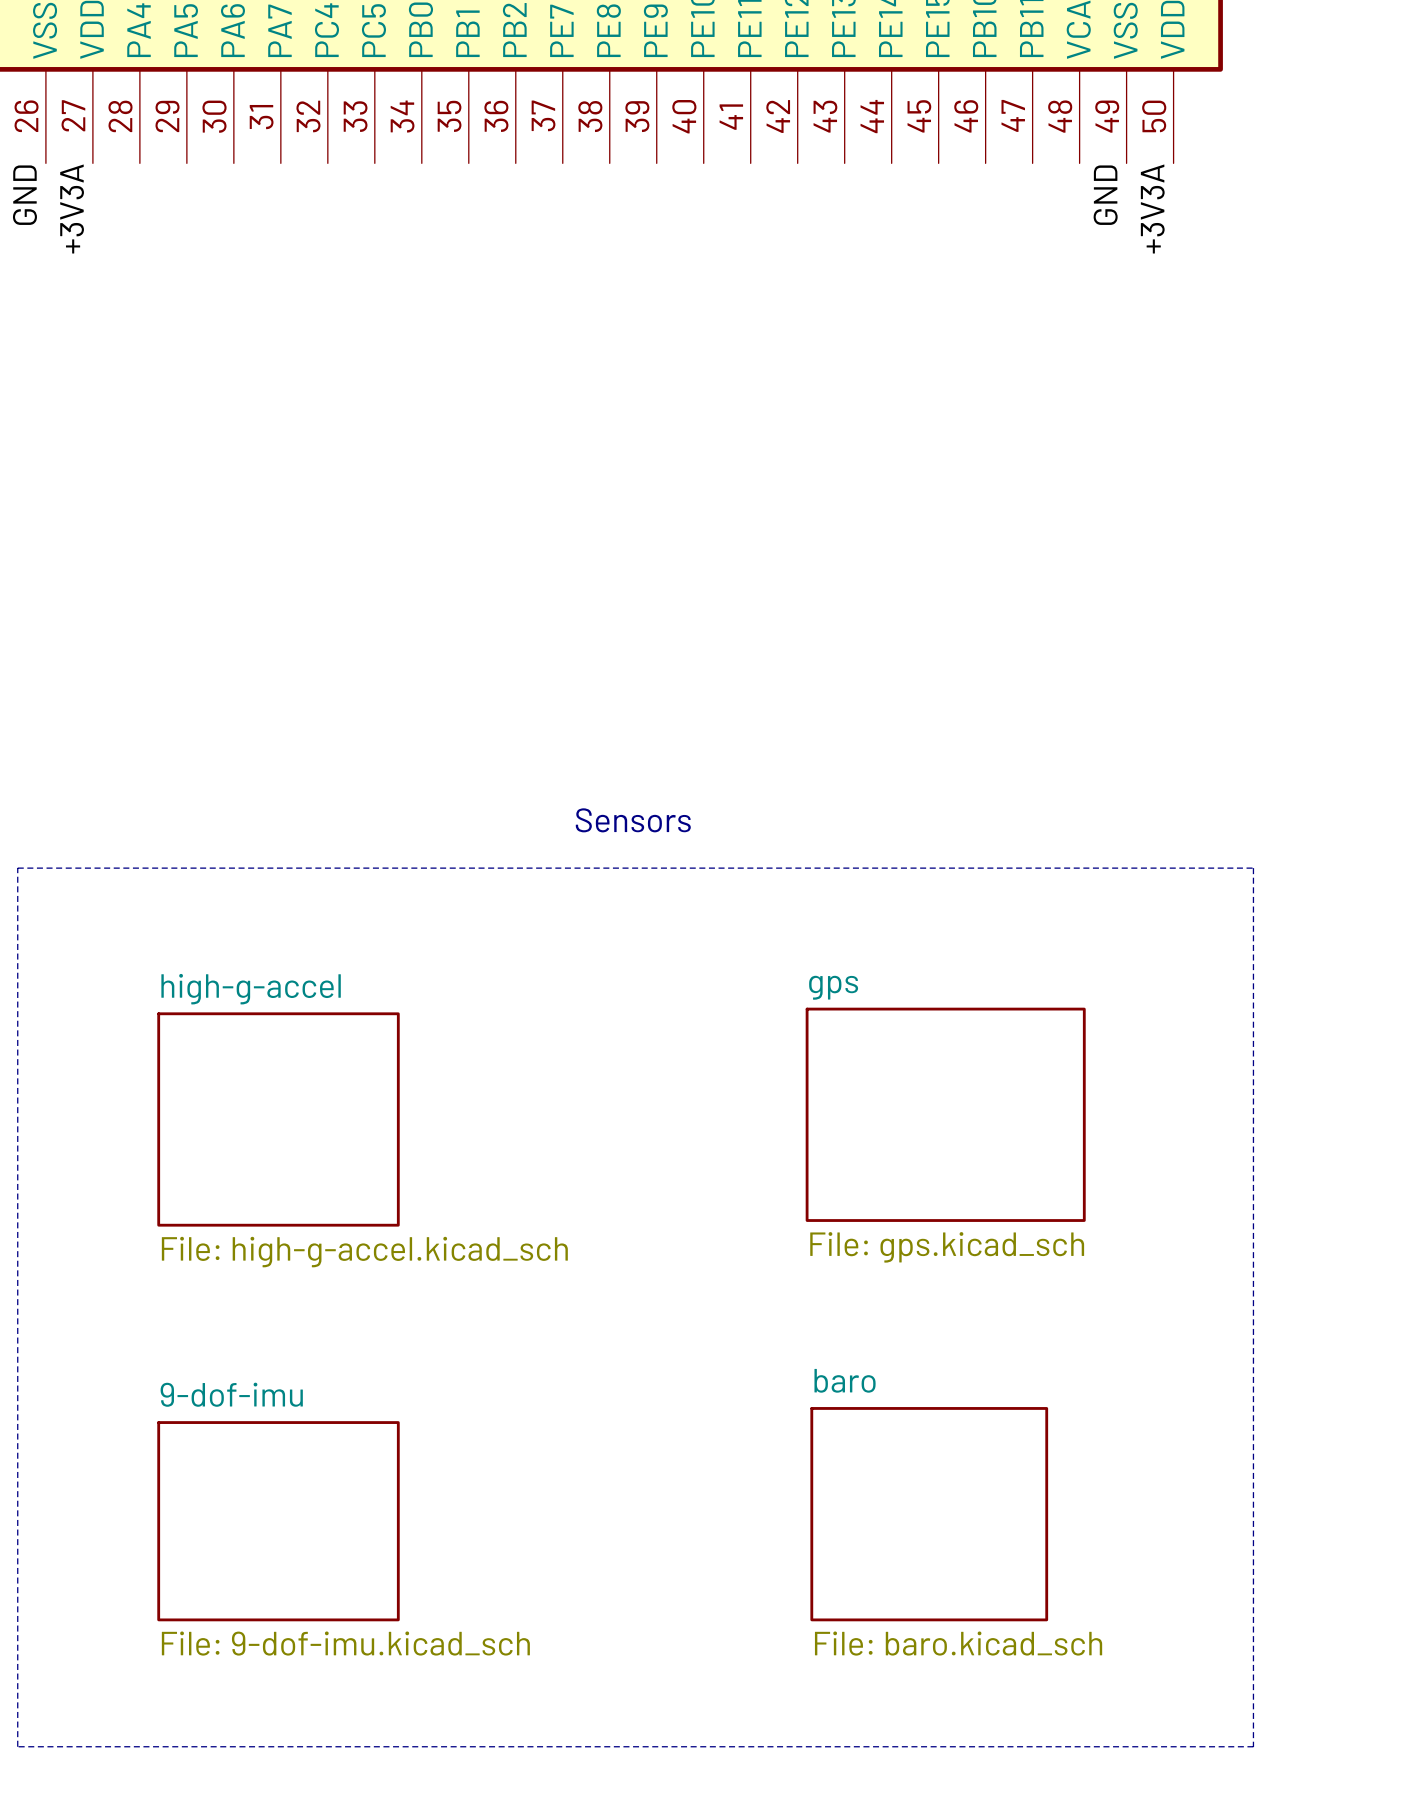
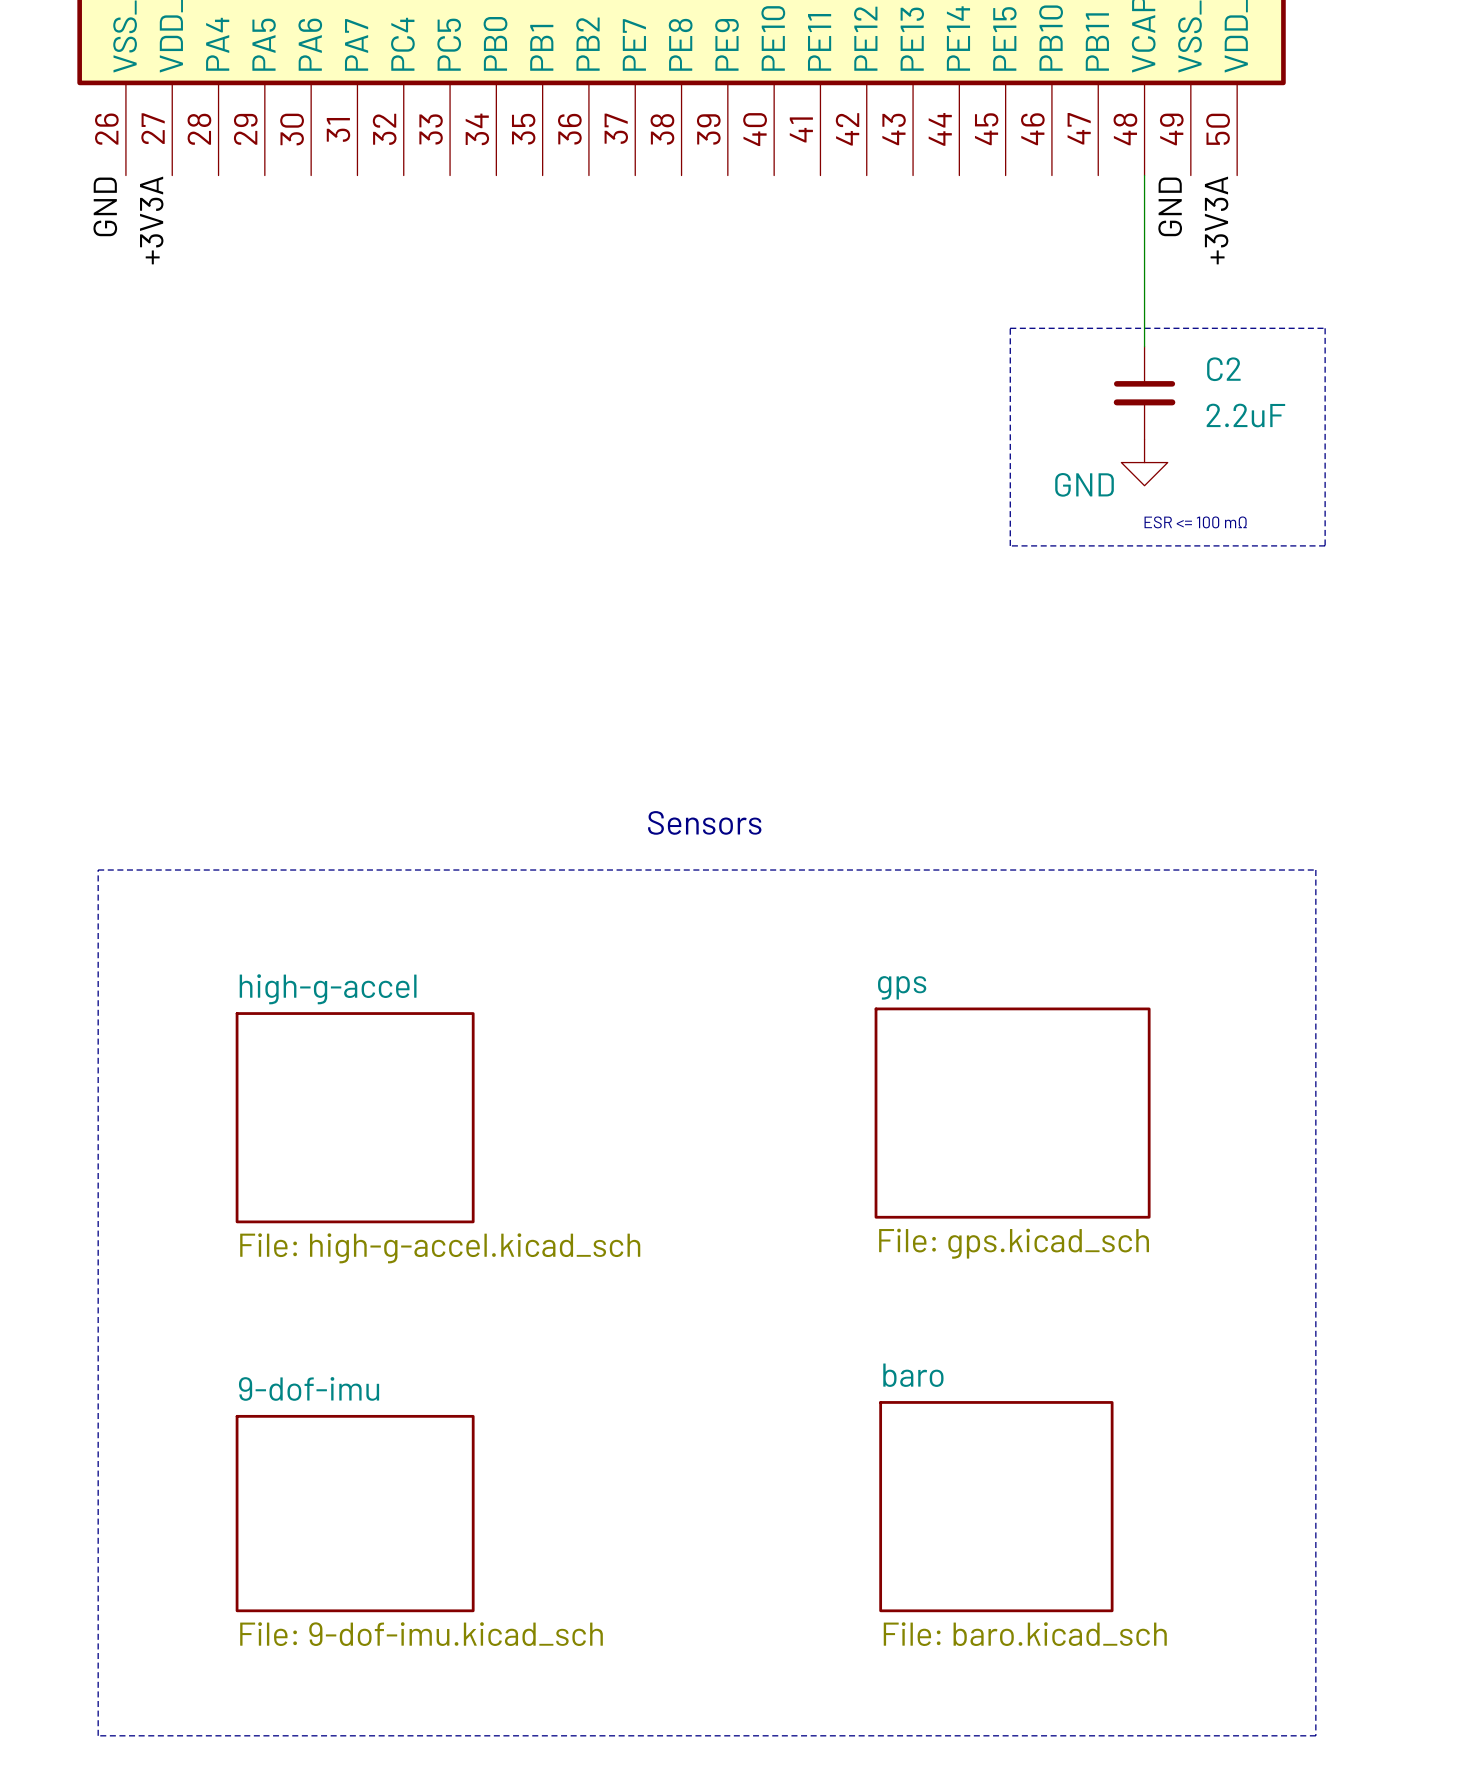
wire: none -> (1144, 175) (1144, 346)
line: none -> (1010, 328) (1325, 328) (1325, 545) (1010, 545) (1010, 328)
C2: none -> 2.2uF (1144, 393)
power symbol: none -> GND (1144, 462)
text: none -> ESR <= 100 mΩ (1195, 522)

